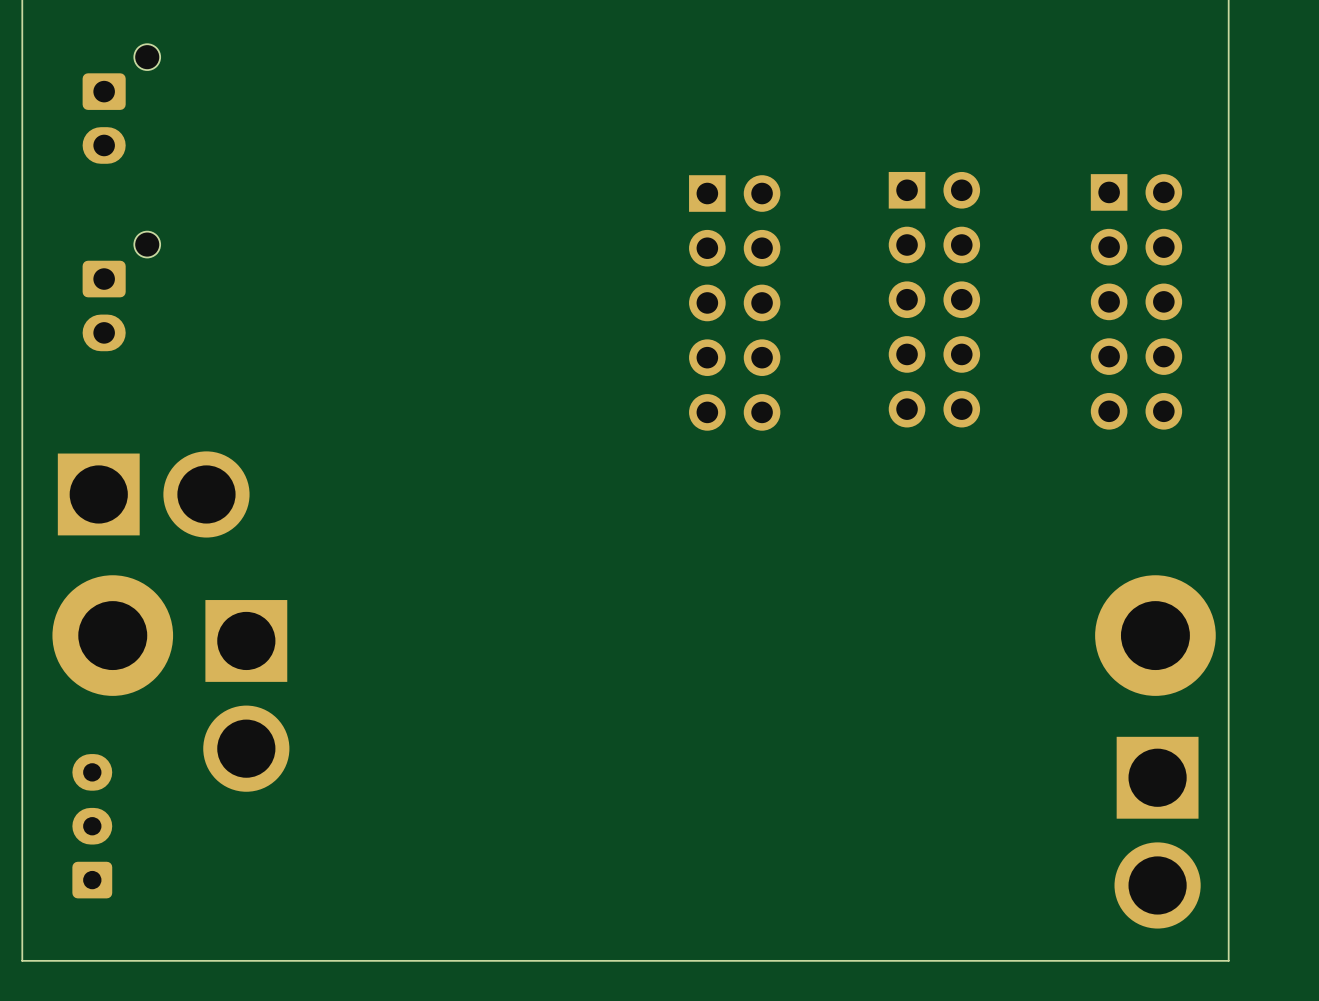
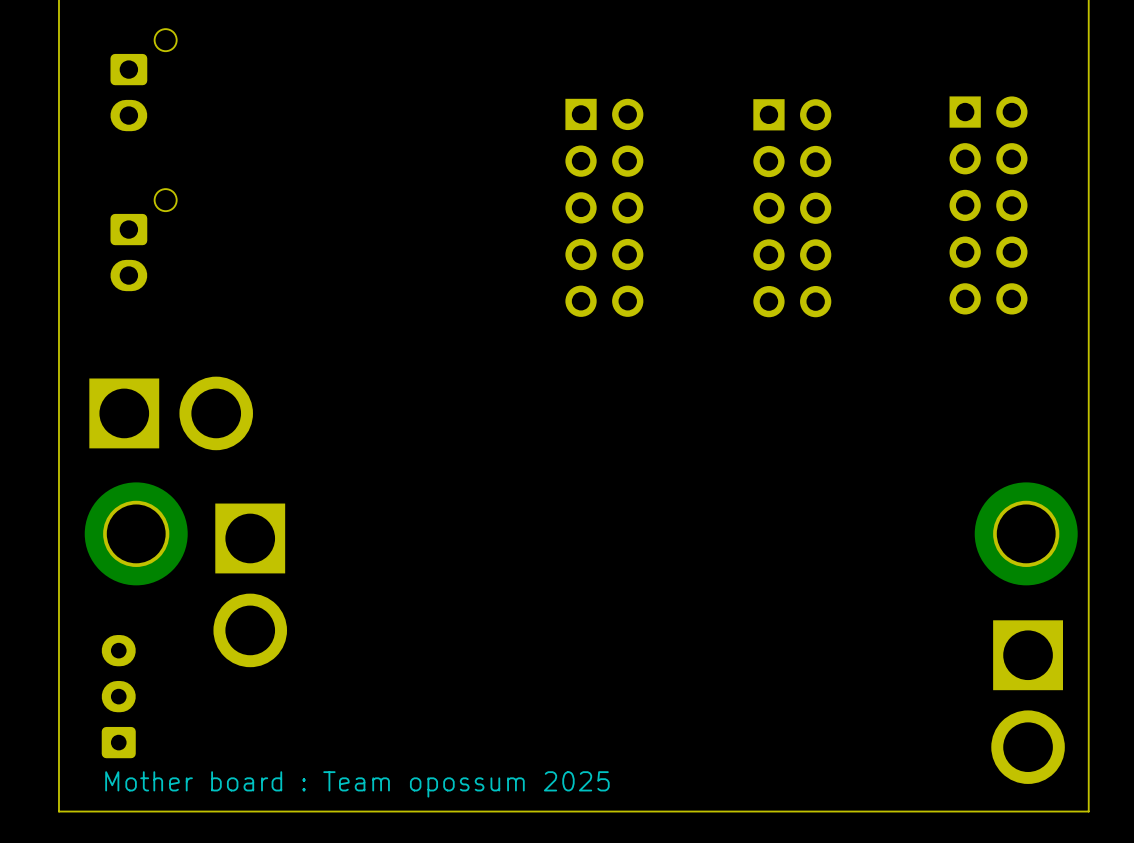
part: none -> (604, 207)
part position: (934, 299) -> (792, 208)
part position: (1136, 301) -> (988, 205)
part: (734, 302) -> none
text: none -> Mother board : Team opossum 2025 (357, 784)

